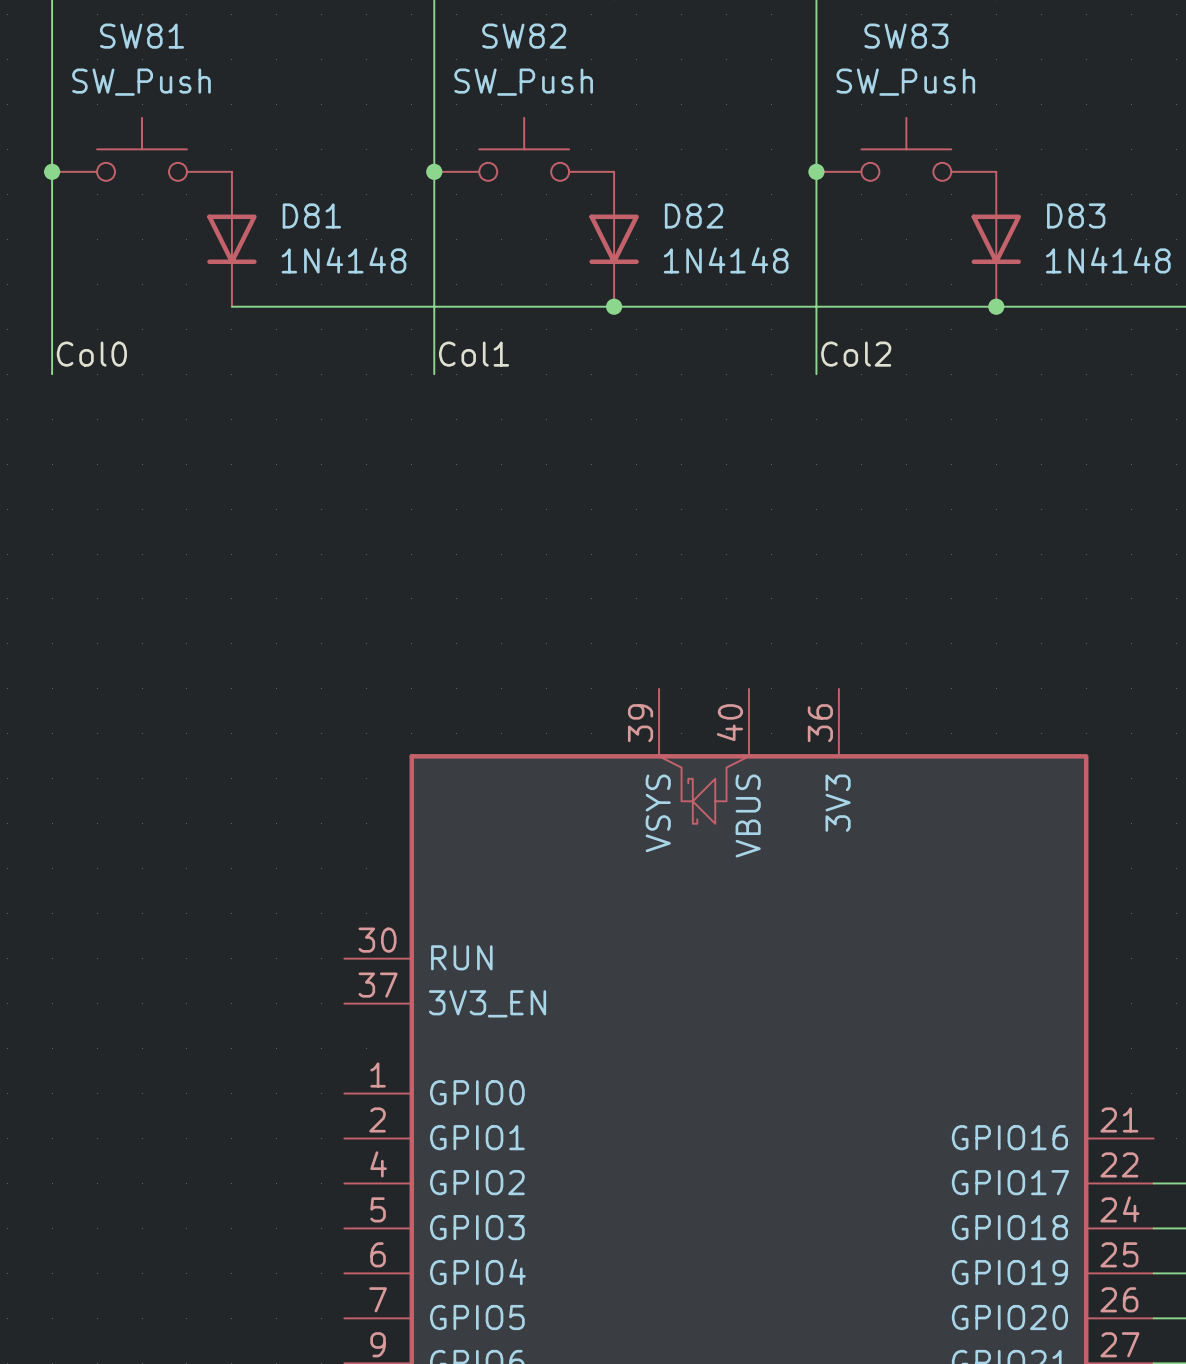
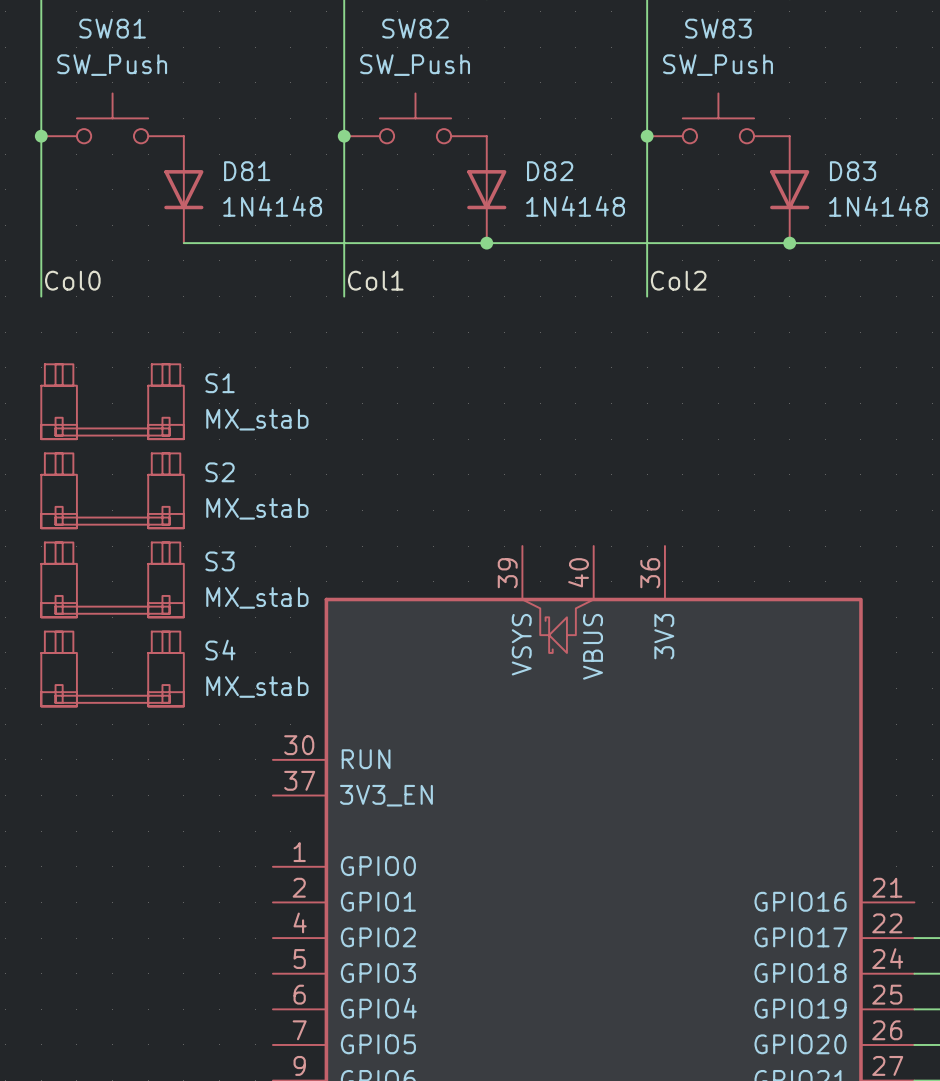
S1: none -> MX_stab (112, 401)
S2: none -> MX_stab (112, 490)
S3: none -> MX_stab (112, 579)
S4: none -> MX_stab (112, 669)

